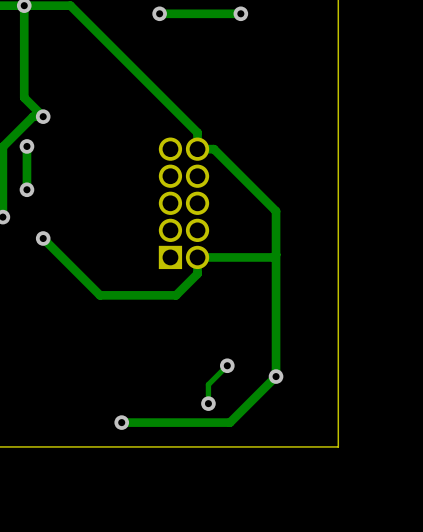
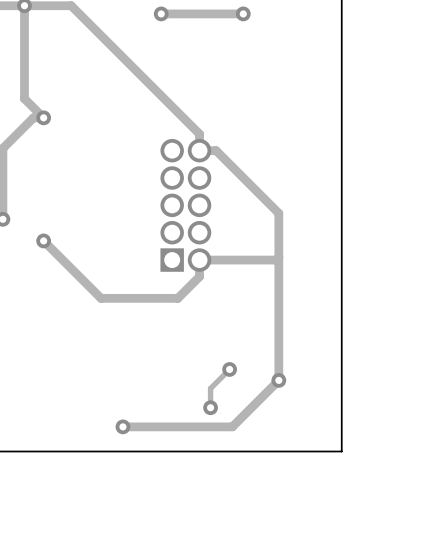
track: (26, 146) (26, 189) -> none
via: (26, 146) -> none
via: (26, 189) -> none

